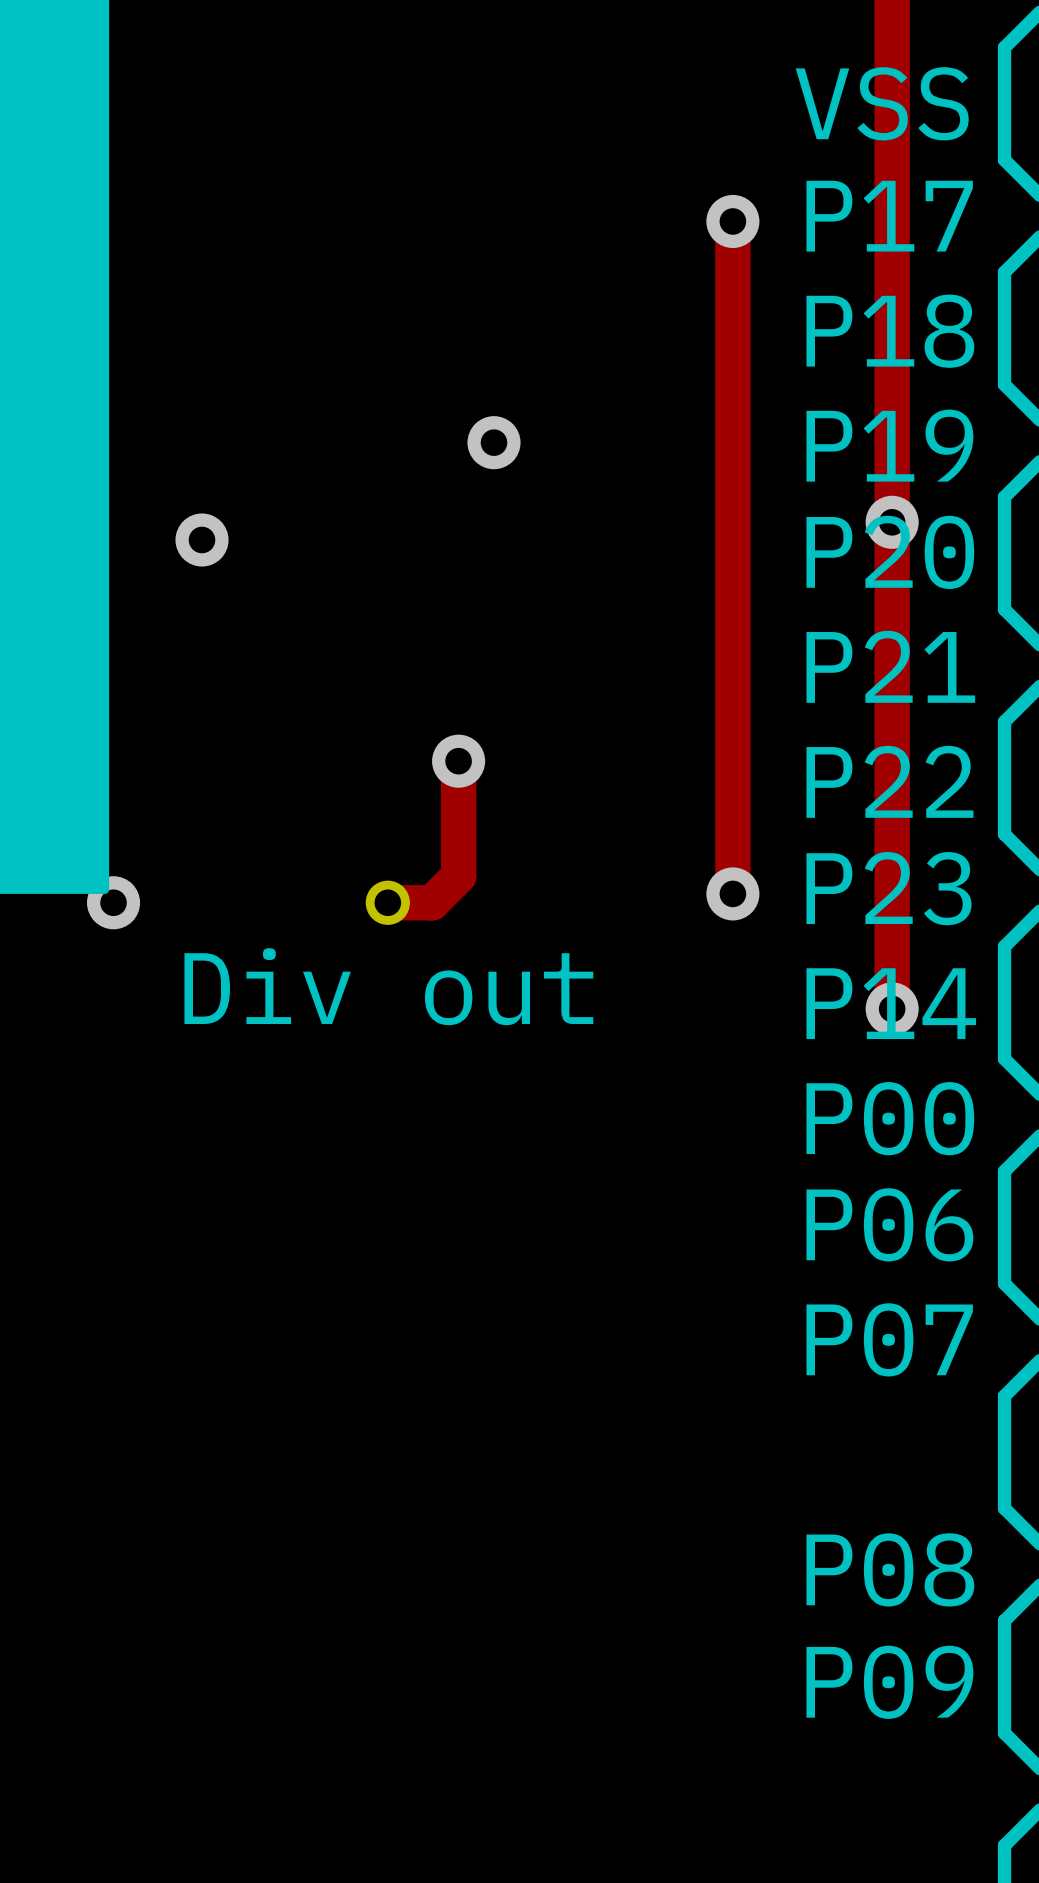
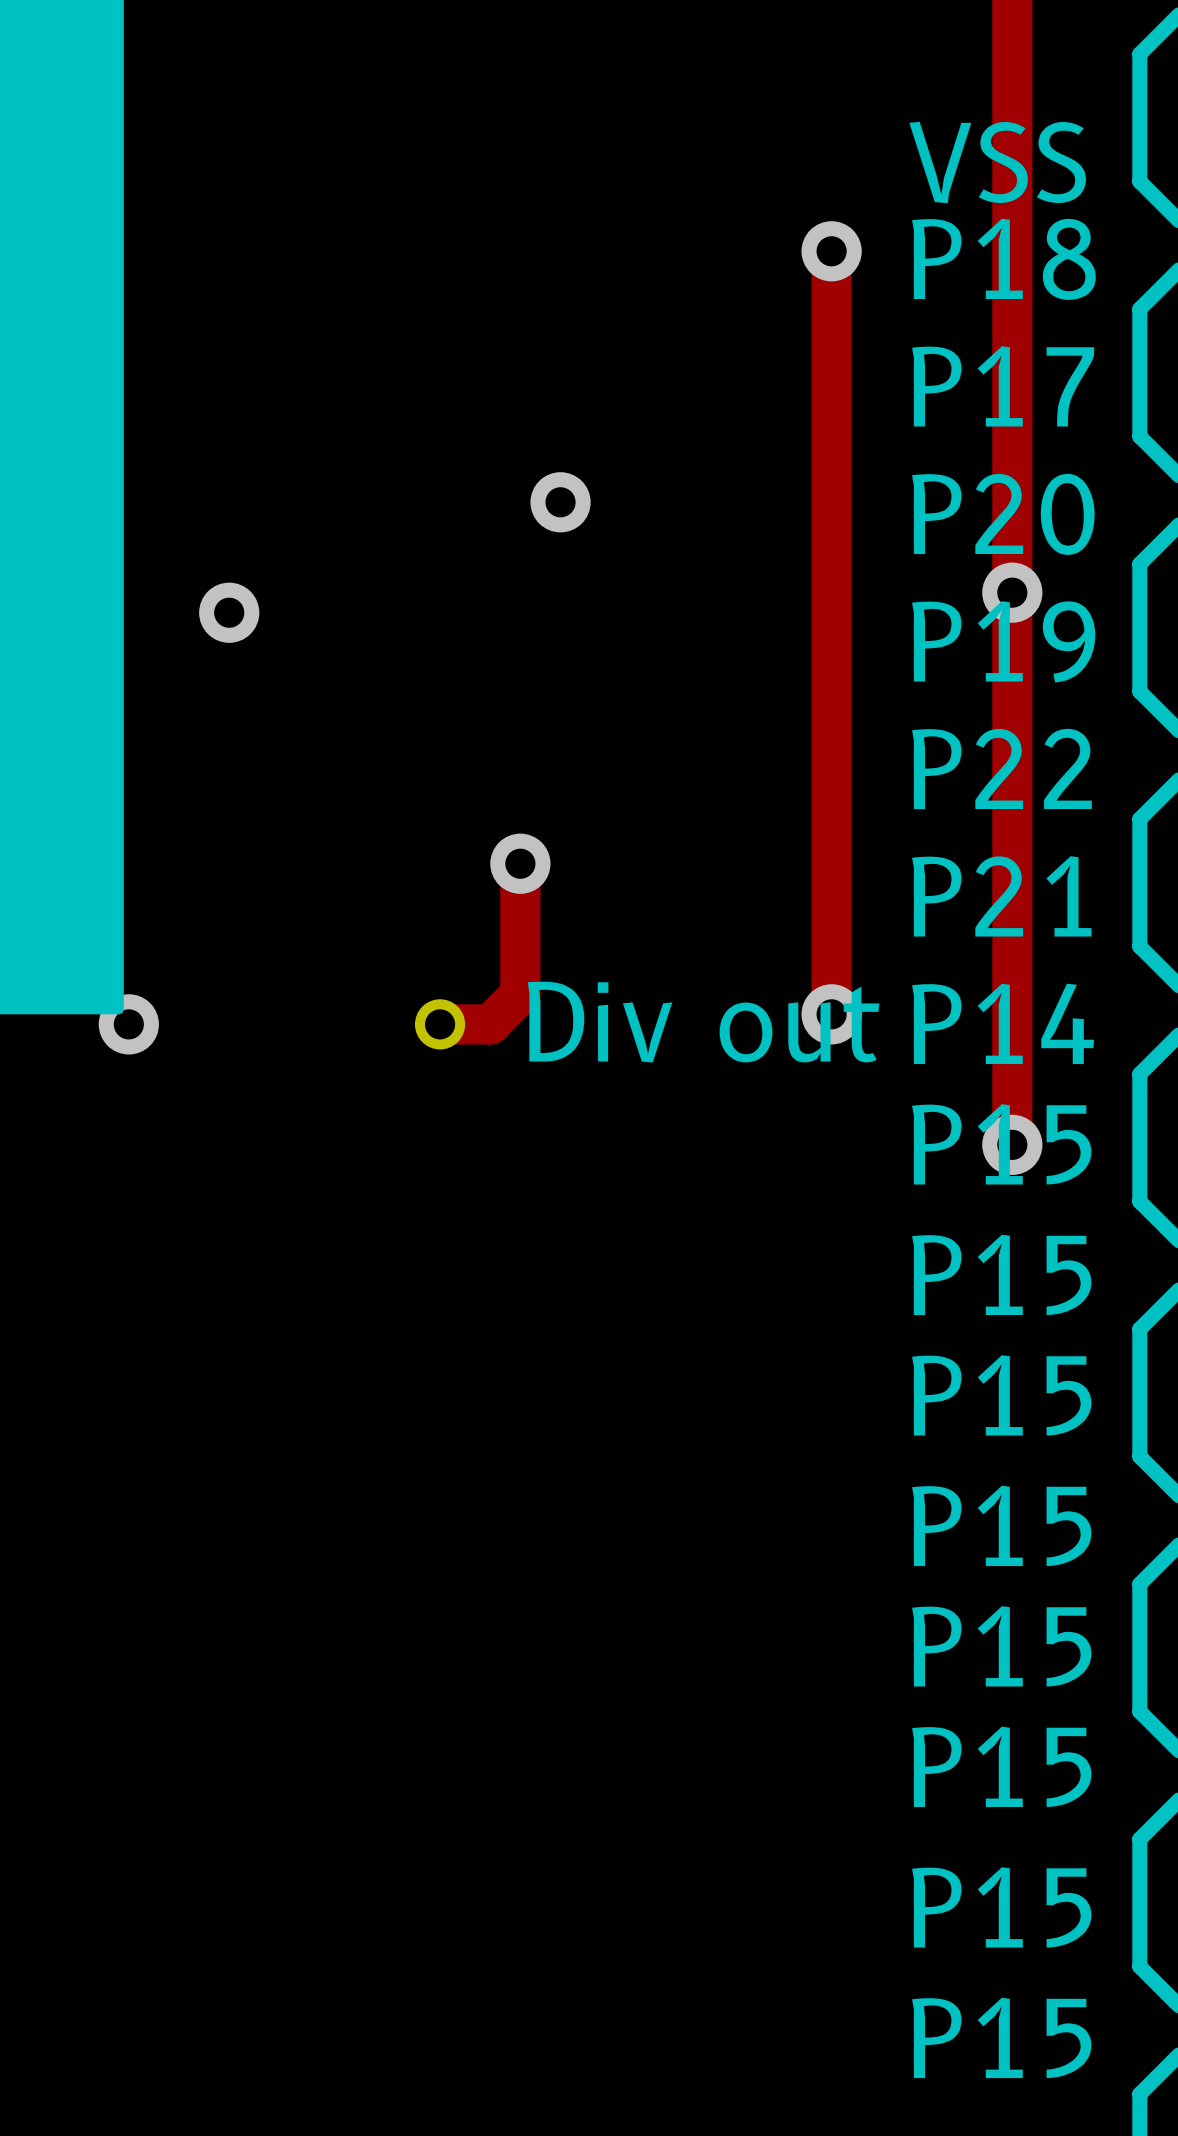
text position: VSS (882, 103) -> VSS (997, 162)
text position: P17 (889, 216) -> P17 (1003, 386)
text position: P18 (890, 331) -> P18 (1003, 259)
text: P19 (889, 445) -> P20 (1003, 514)
text: P20 (890, 552) -> P19 (1003, 641)
text: P21 (890, 666) -> P22 (1001, 768)
text: P22 (889, 781) -> P21 (1001, 896)
text: P23 (889, 888) -> P14 (1003, 1023)
part value position: Div out (388, 986) -> Div out (703, 1022)
text: P14 (891, 1003) -> P15 (1001, 1144)
text: P00 (890, 1118) -> P15 (1001, 1274)
text: P06 (889, 1224) -> P15 (1001, 1395)
text: P07 (889, 1339) -> P15 (1001, 1525)
text: none -> P15 (1001, 1646)
text: P08 (890, 1569) -> P15 (1001, 1766)
text: P09 (889, 1682) -> P15 (1001, 1907)
text: none -> P15 (1001, 2037)

